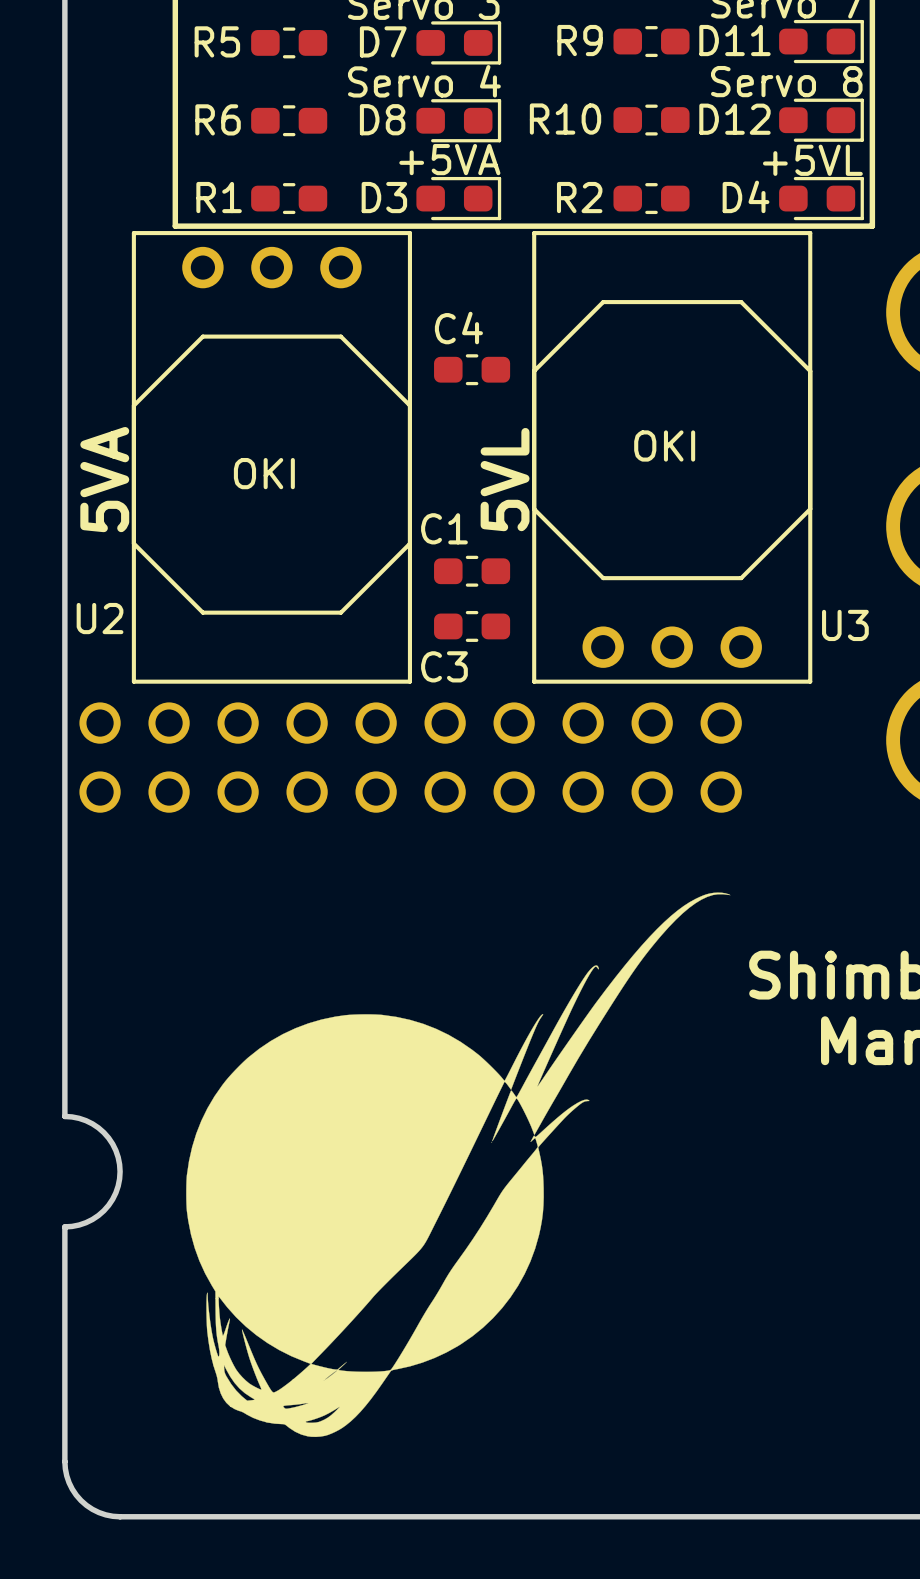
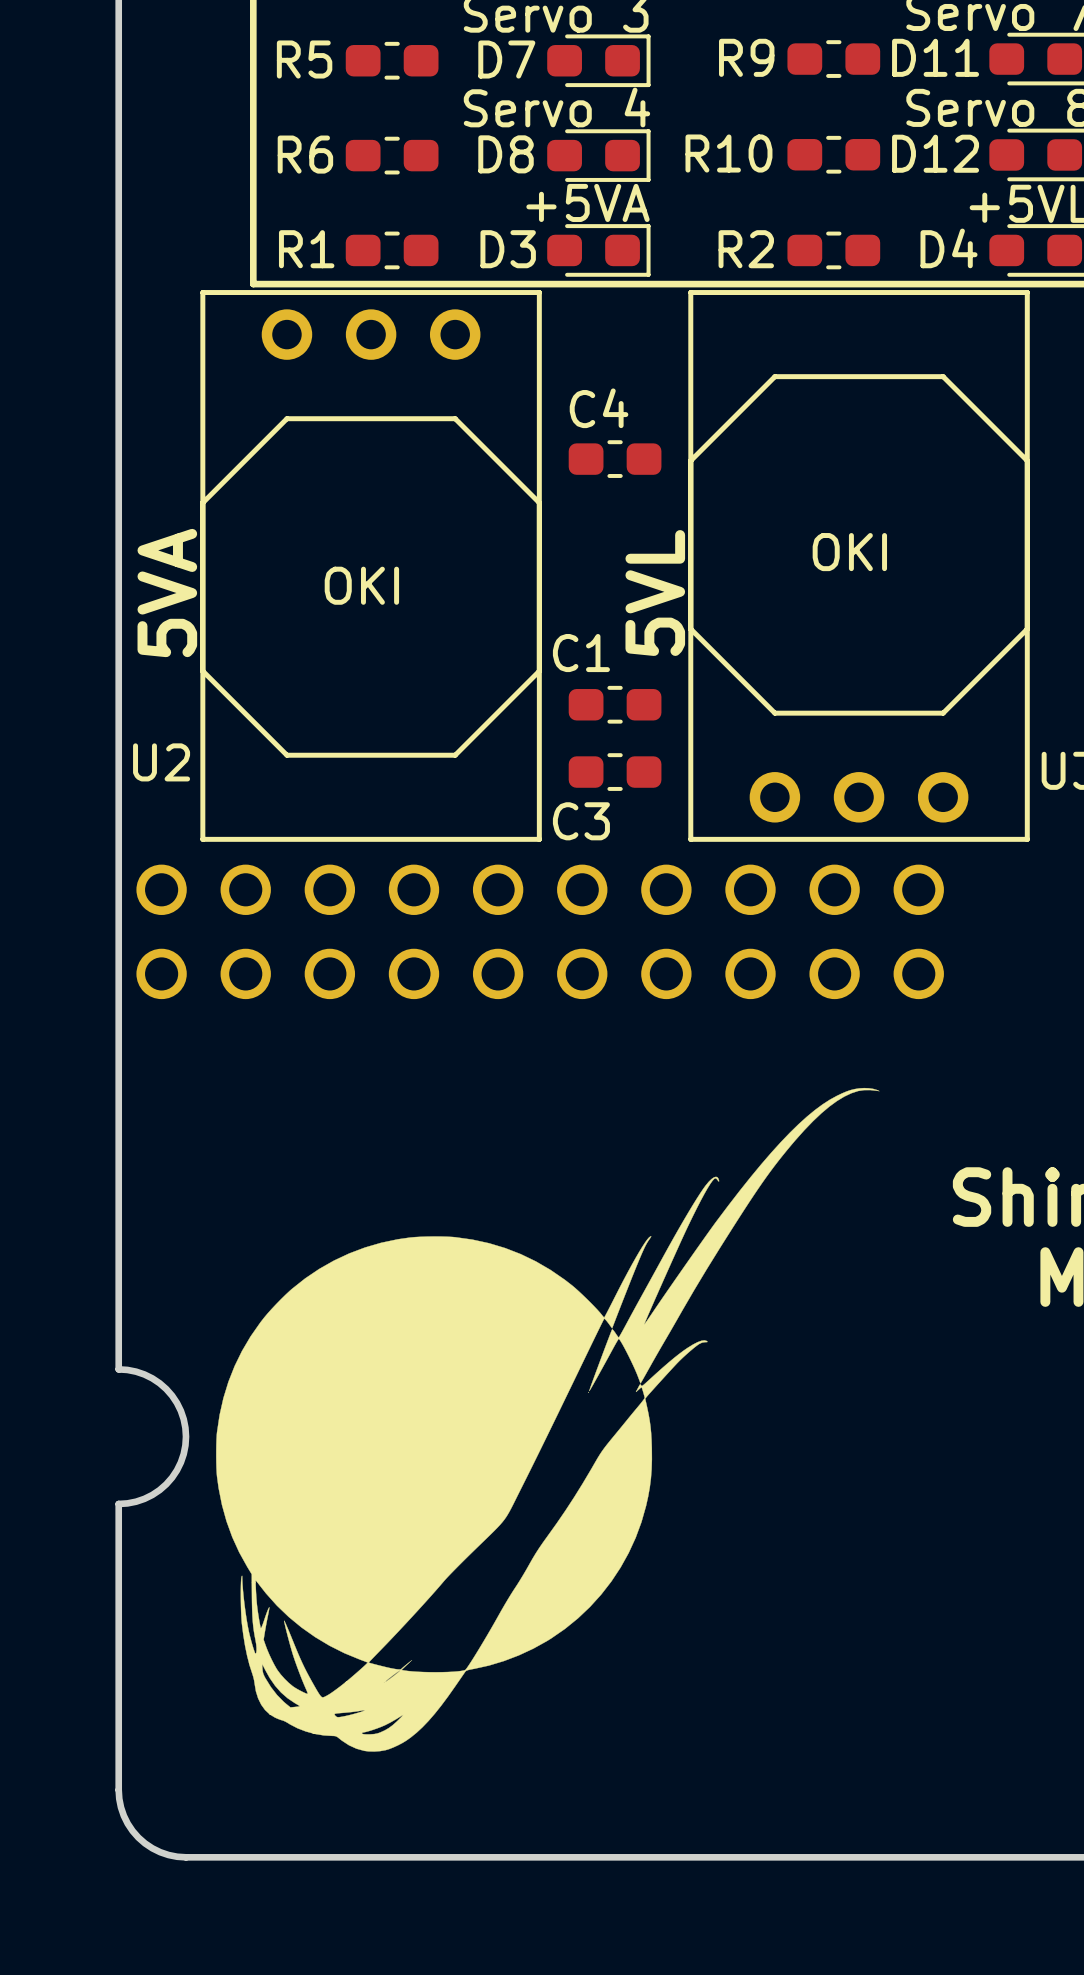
drawing position: (458, 1164) -> (547, 1419)

